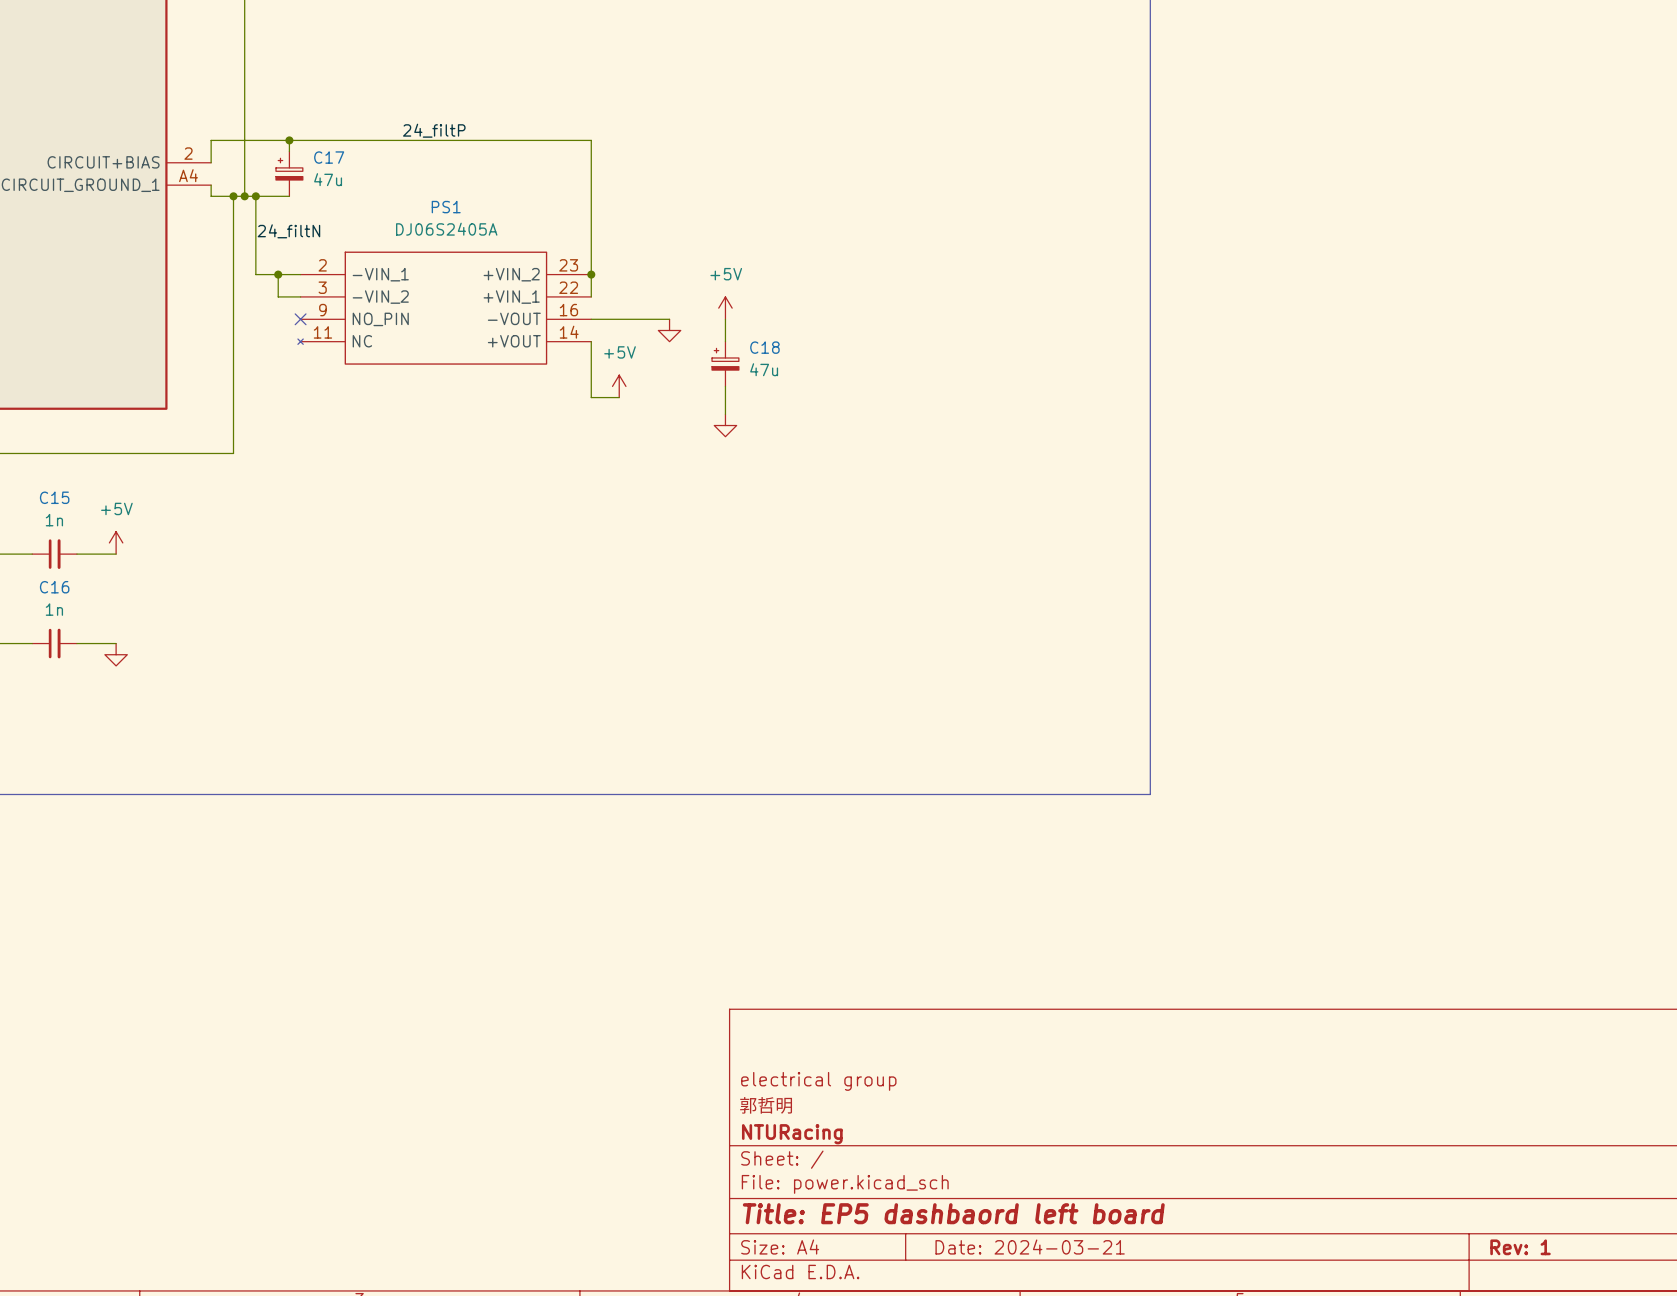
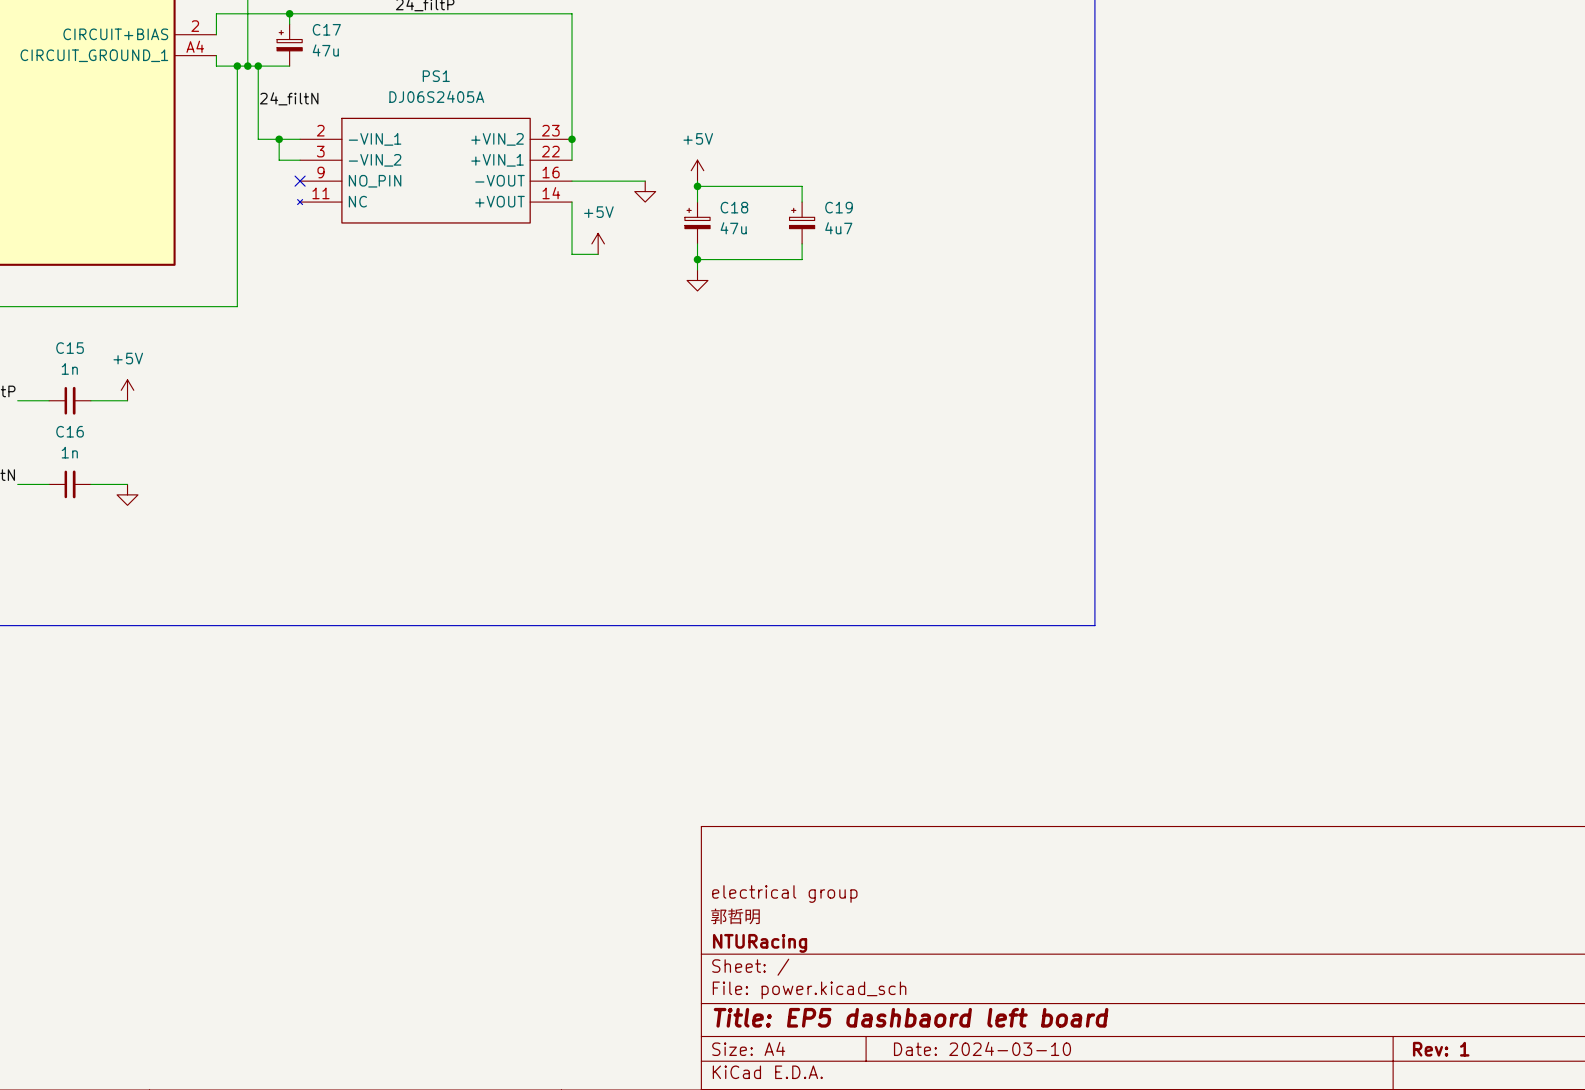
wire: none -> (697, 186) (802, 186) (802, 202)
junction: none -> (697, 186)
C19: none -> 4u7 (802, 222)
wire: none -> (802, 243) (802, 259) (697, 259)
junction: none -> (697, 259)
title block: Date: 2024-03-21 (1030, 1247) -> Date: 2024-03-10 (982, 1048)

